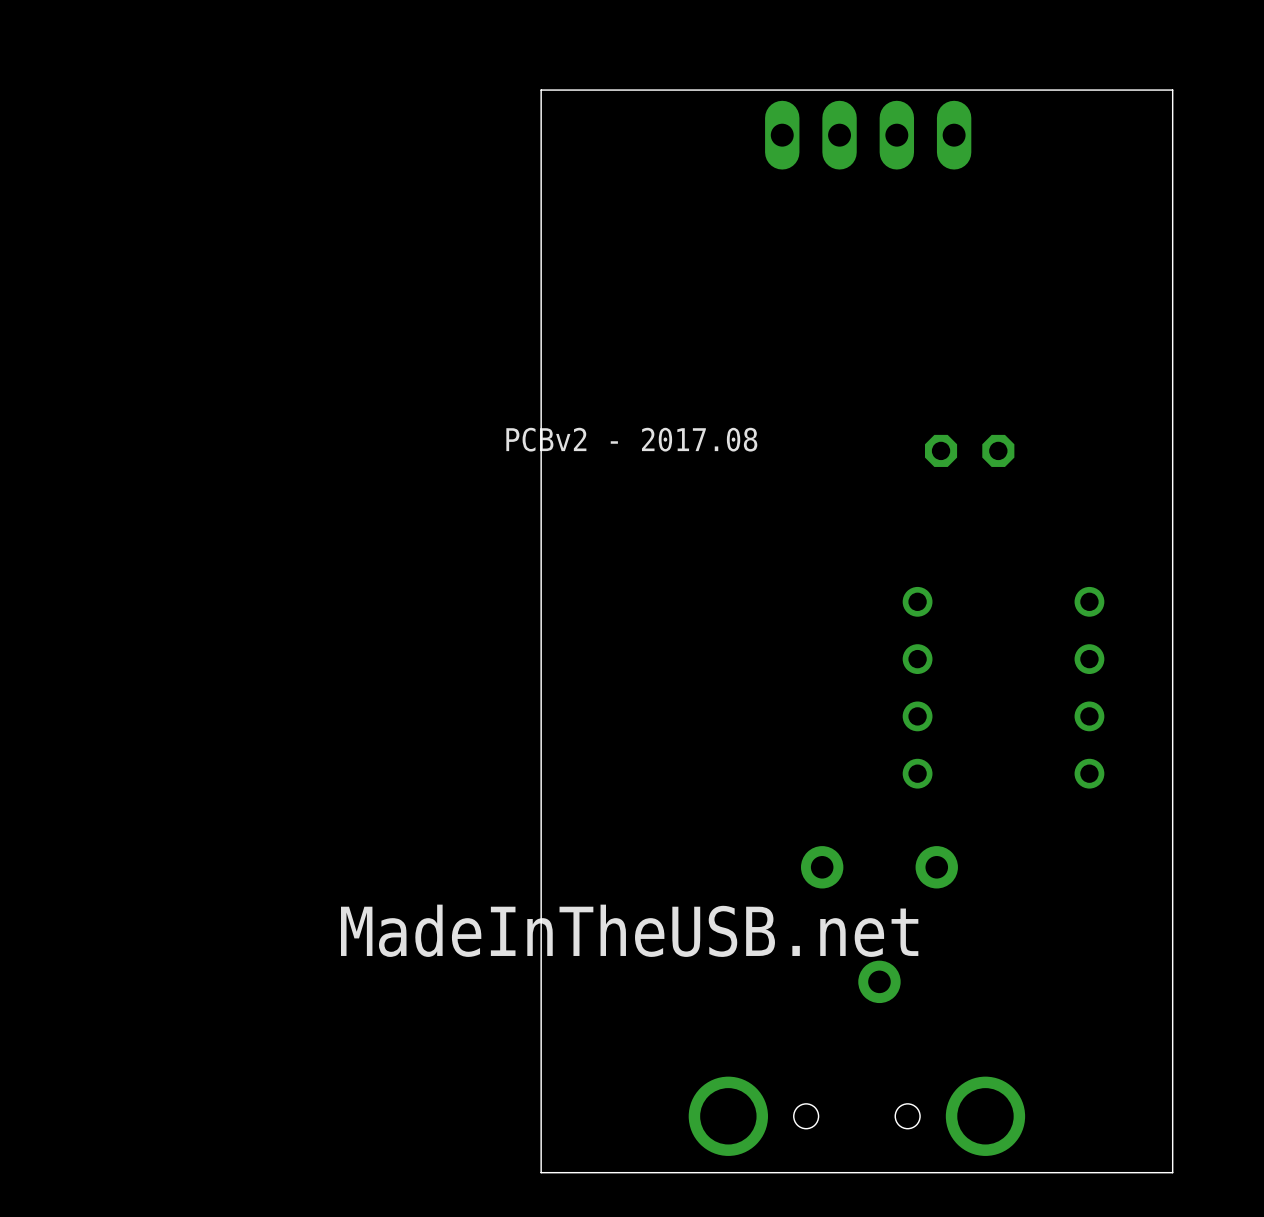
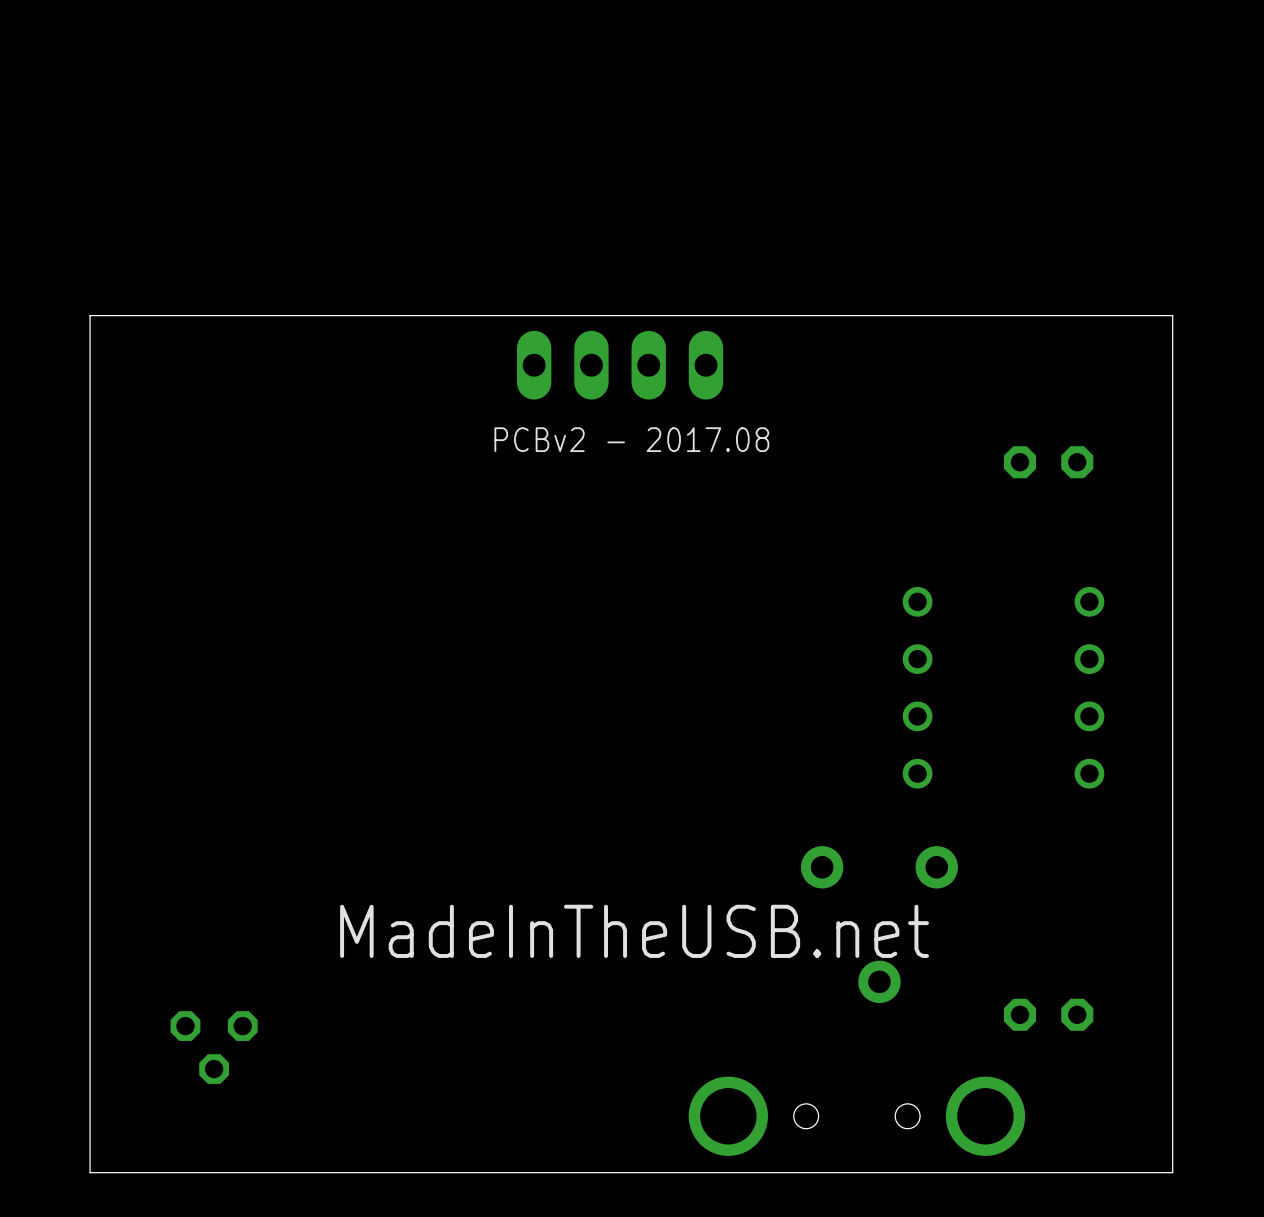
part position: (868, 135) -> (620, 365)
board edge: (1172, 315) (1172, 90) (541, 90) (541, 1172) -> (1172, 315) (90, 315) (90, 1172) (541, 1172)
part position: (969, 450) -> (1048, 462)
part: none -> (1048, 1014)
part: none -> (214, 1047)

